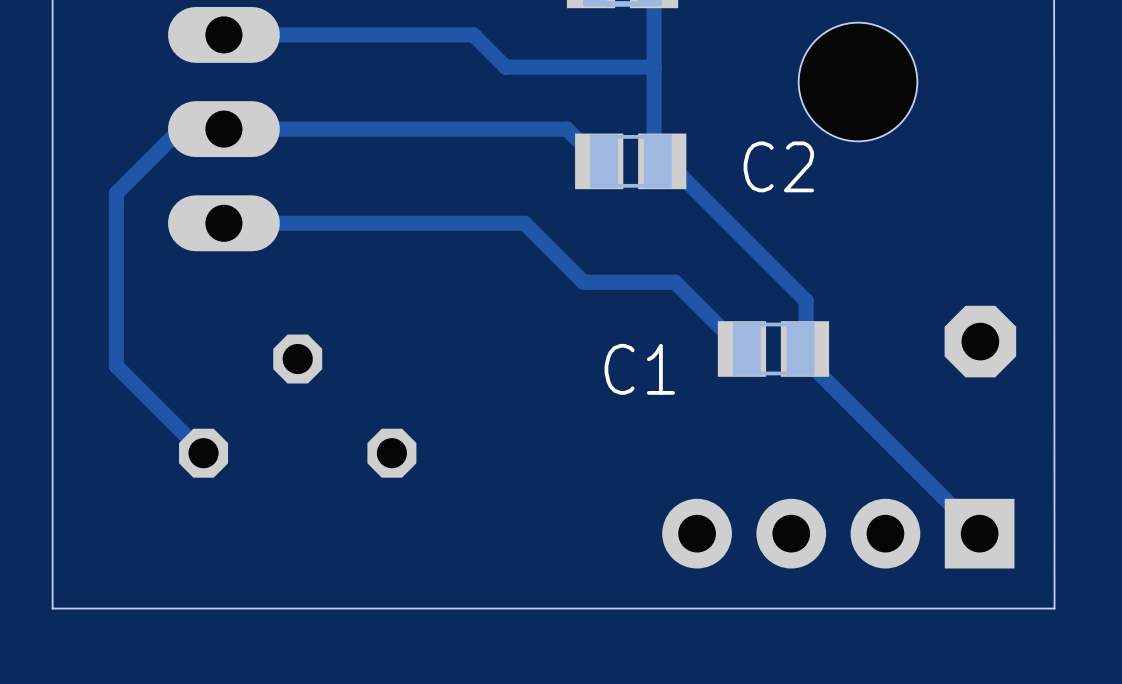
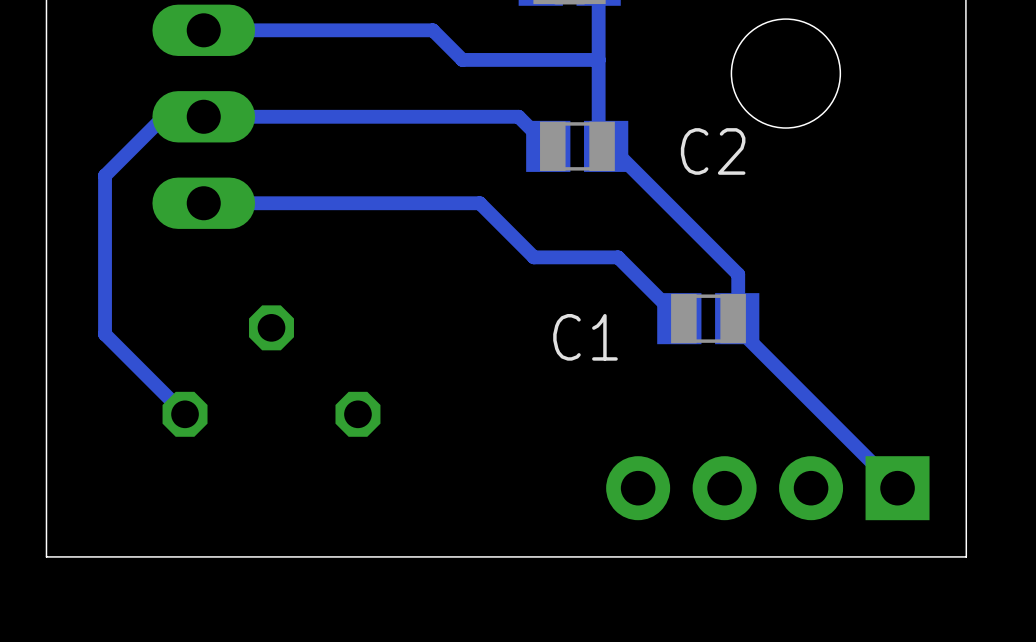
part: (980, 341) -> none

